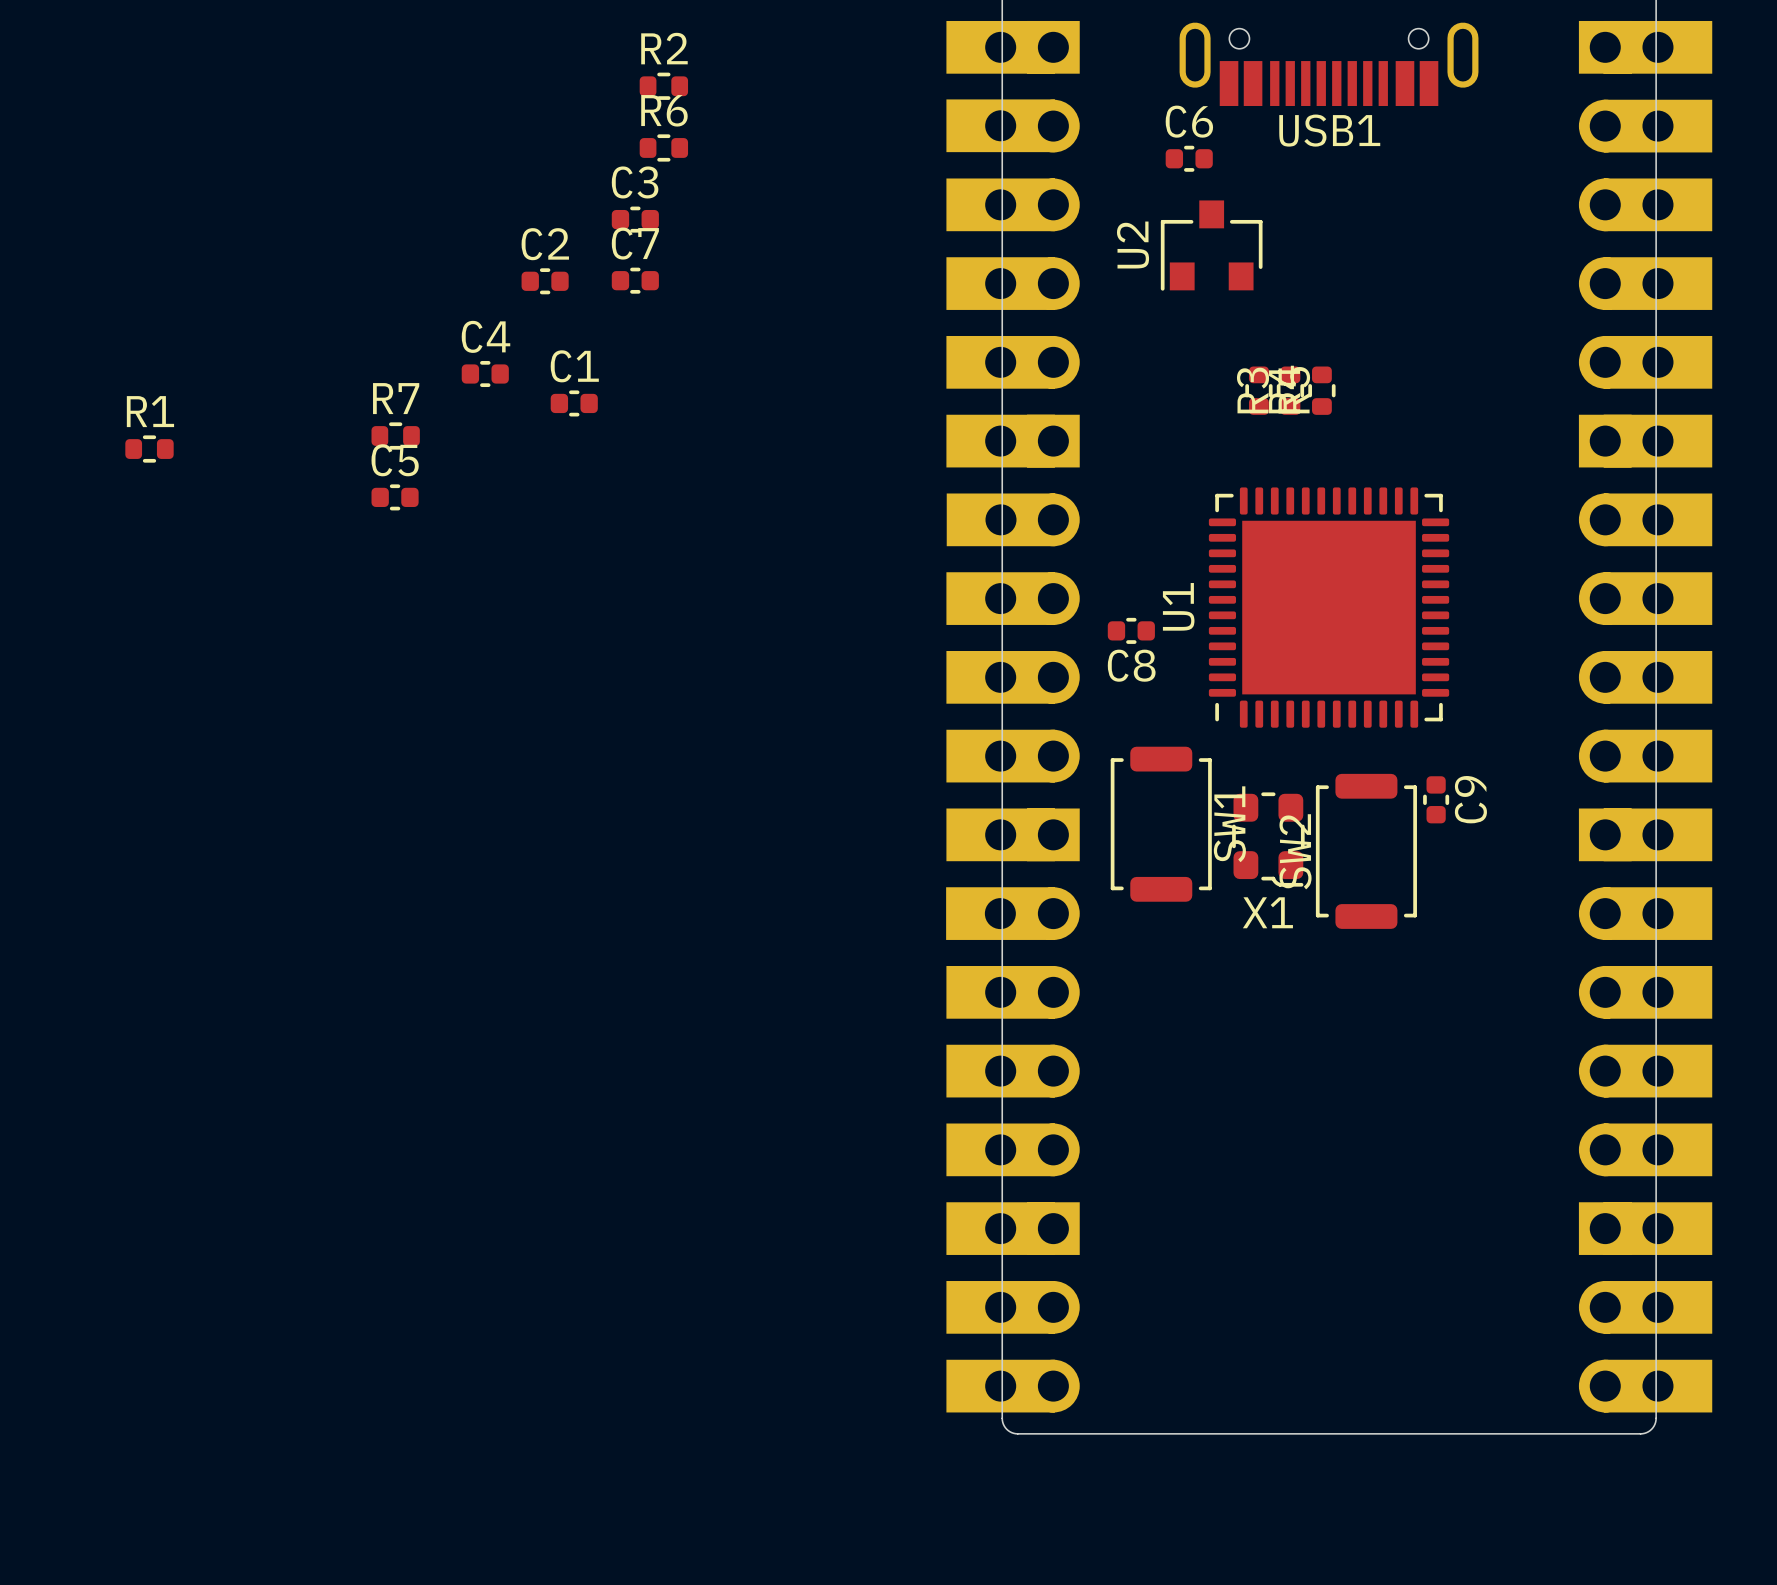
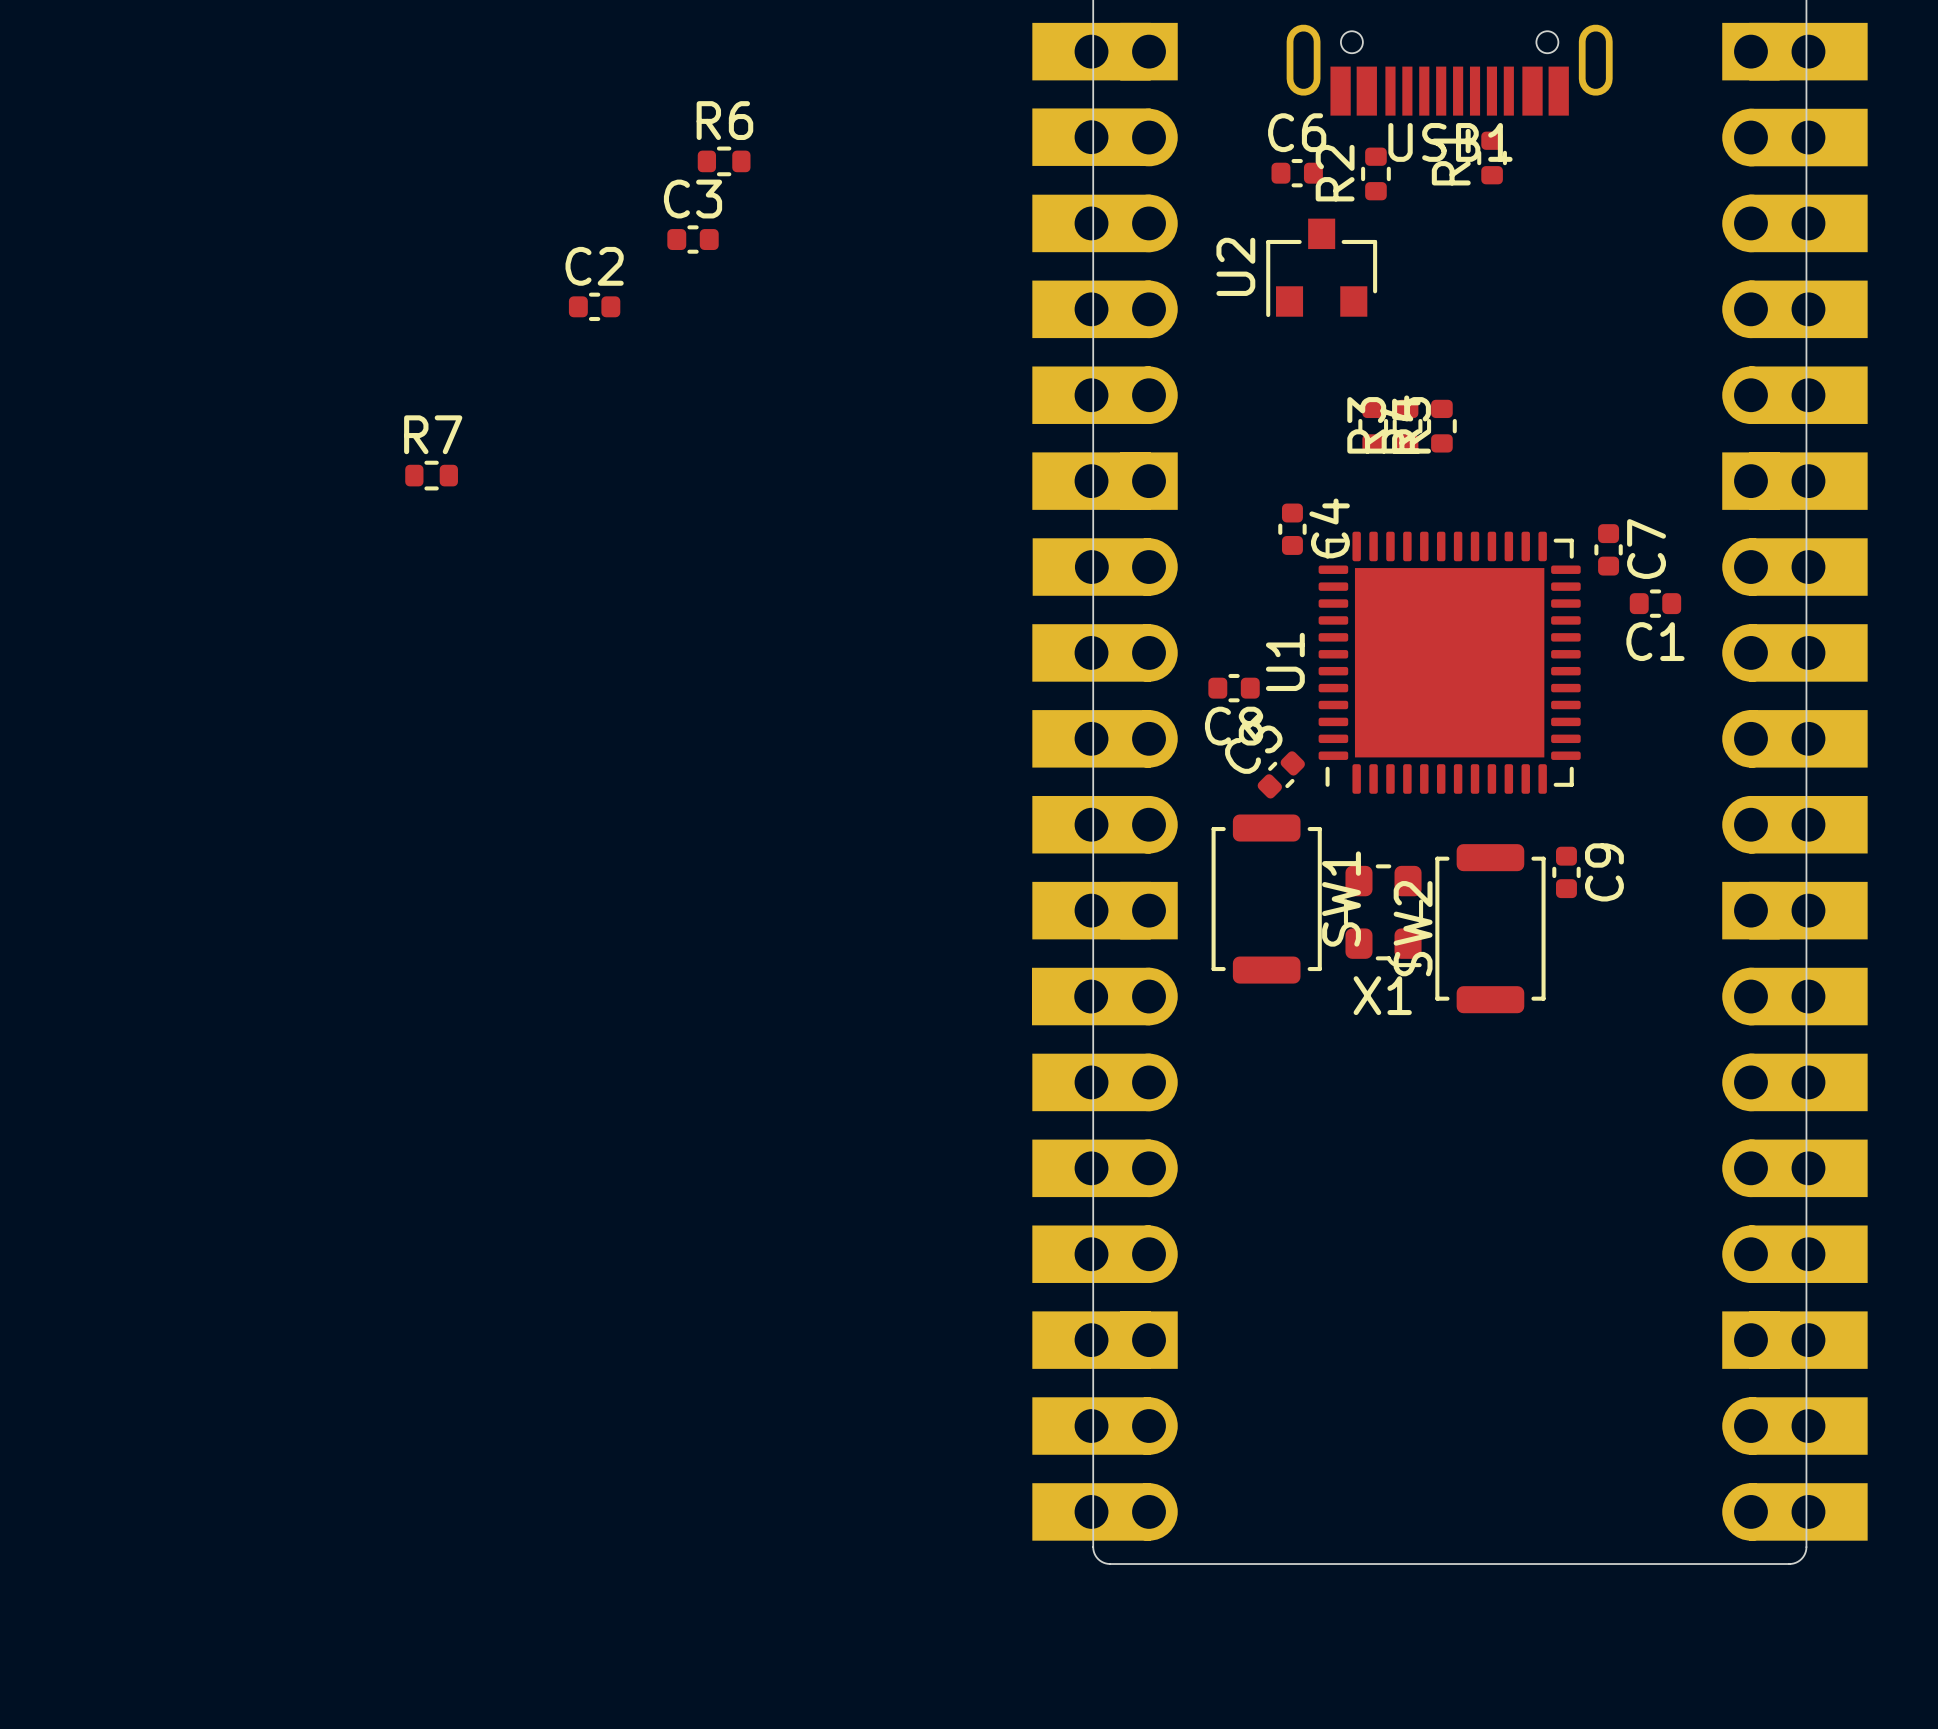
R2 rotation: 0° (663, 86) -> 90° clockwise (1375, 173)
R2 position: (663, 86) -> (1375, 173)
C7 rotation: 0° (635, 280) -> 90° clockwise (1608, 549)
C7 position: (635, 280) -> (1608, 549)
C1 name position: C1 (574, 366) -> C1 (1655, 641)
C4 rotation: 0° (485, 373) -> 90° clockwise (1292, 529)
C4 position: (485, 373) -> (1292, 529)
C1 position: (574, 403) -> (1655, 603)
R1 rotation: 0° (149, 449) -> 90° clockwise (1492, 157)
R1 position: (149, 449) -> (1492, 157)
C5 rotation: 0° (395, 497) -> 45° counterclockwise (1281, 774)
C5 position: (395, 497) -> (1281, 774)

